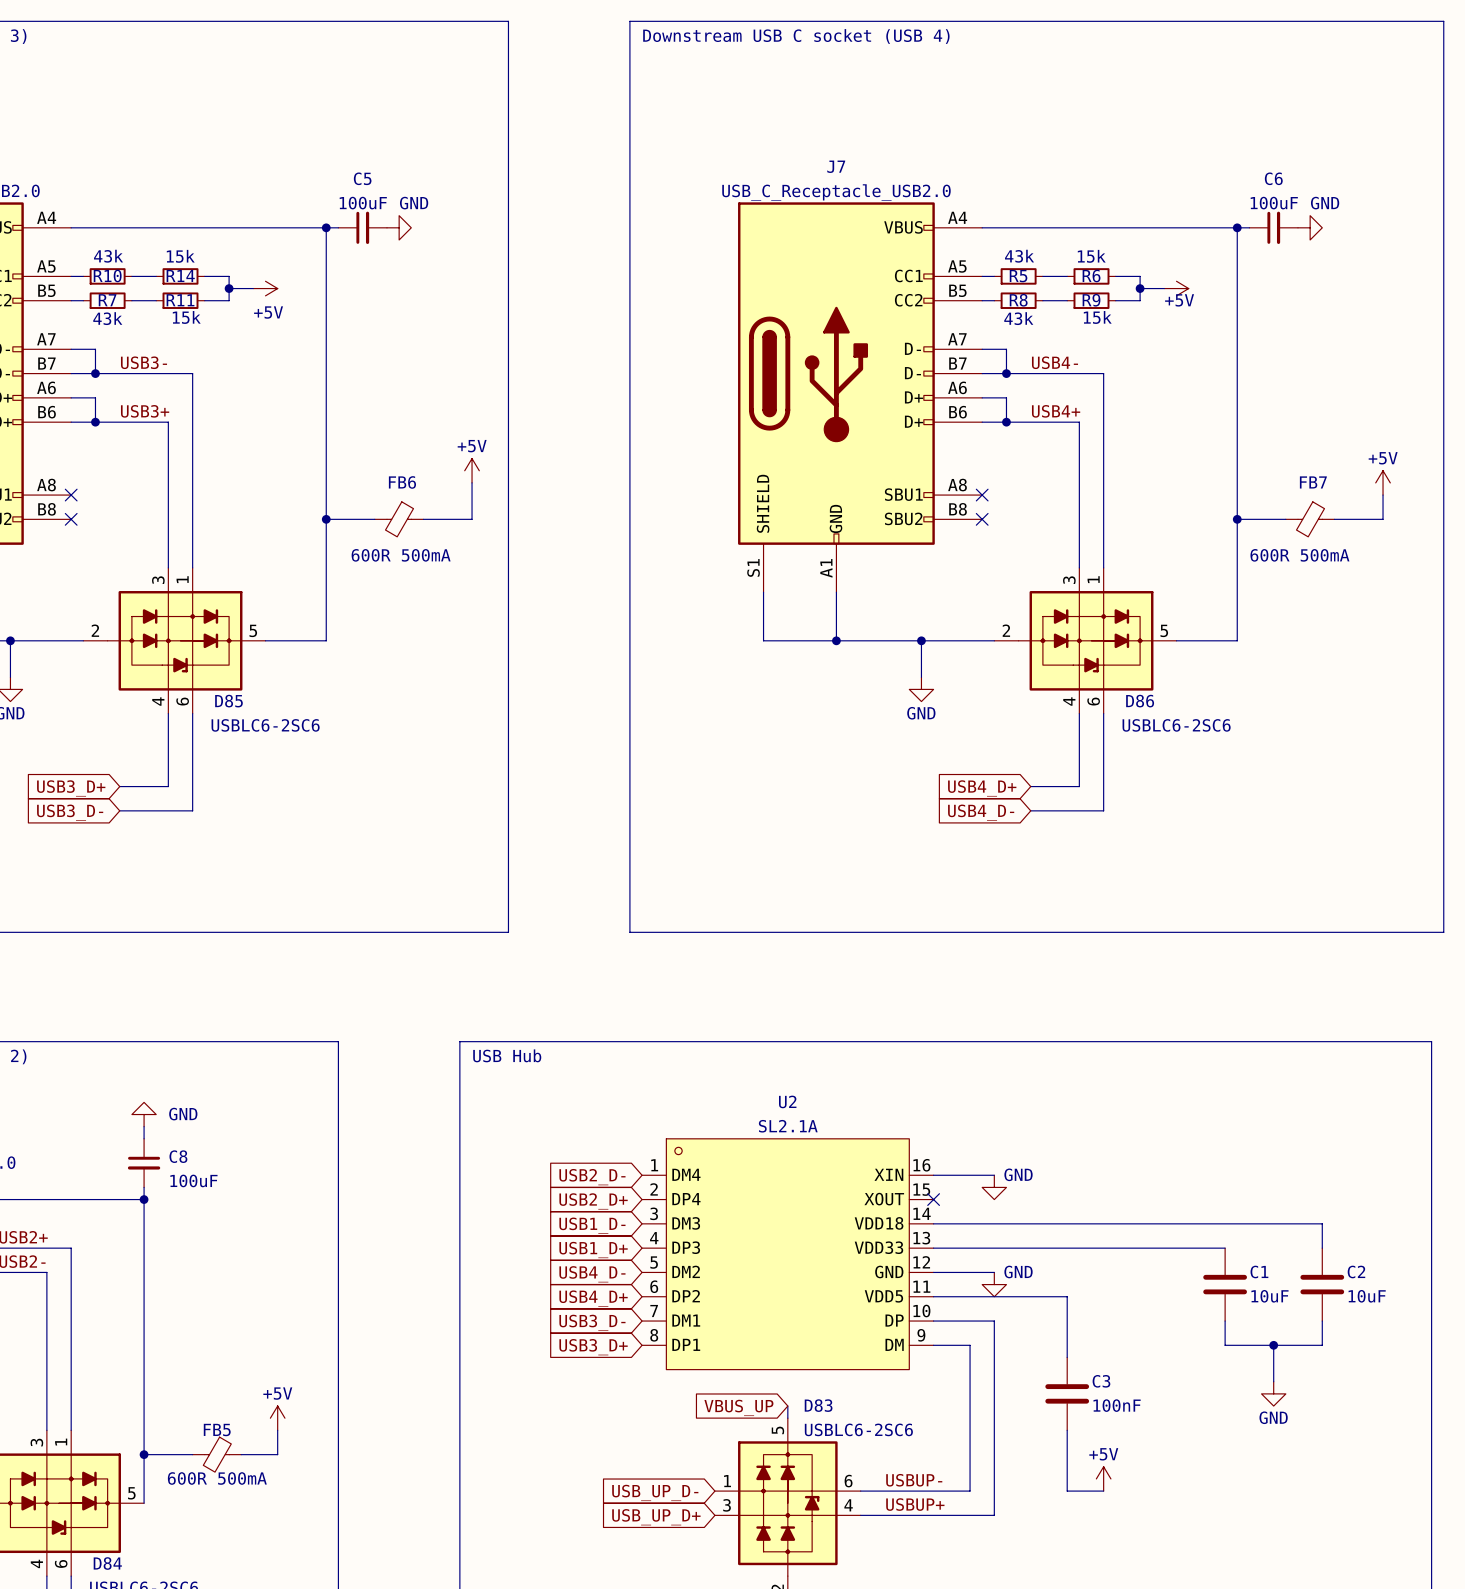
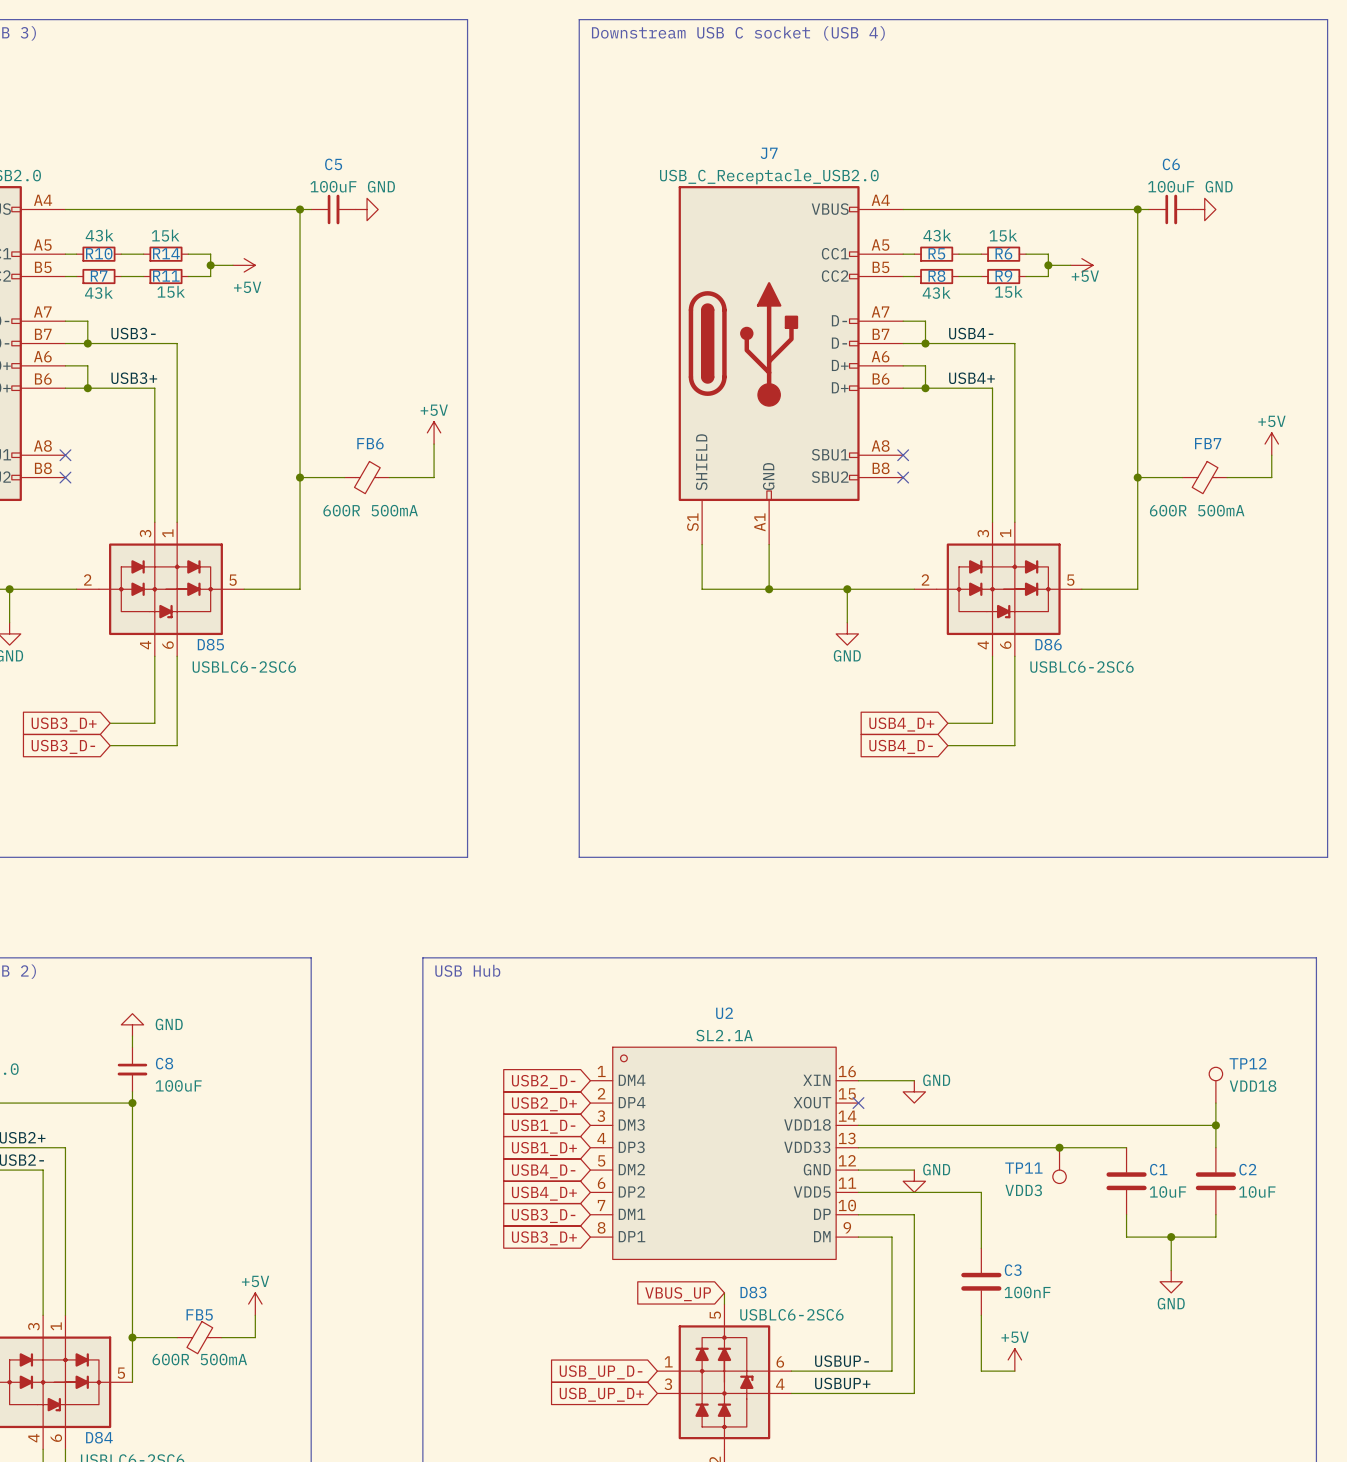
TP12: none -> VDD18 (1215, 1085)
wire: none -> (1215, 1103) (1215, 1125)
junction: none -> (1215, 1125)
junction: none -> (1059, 1147)
TP11: none -> VDD3 (1059, 1165)

